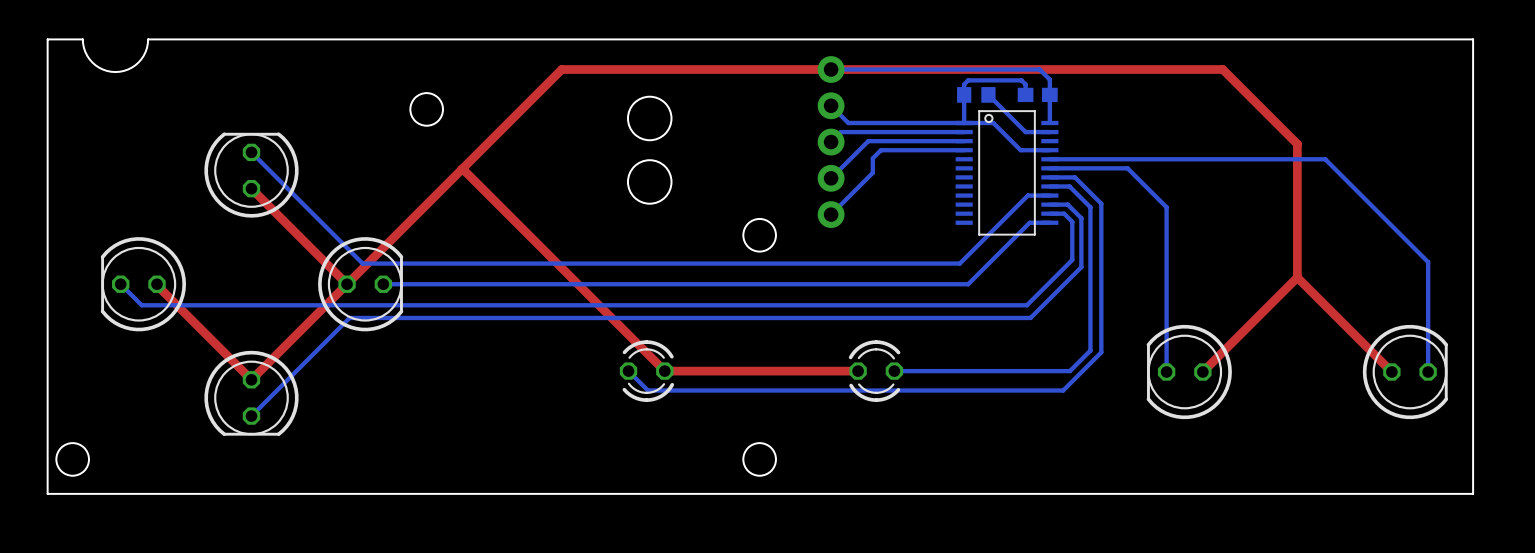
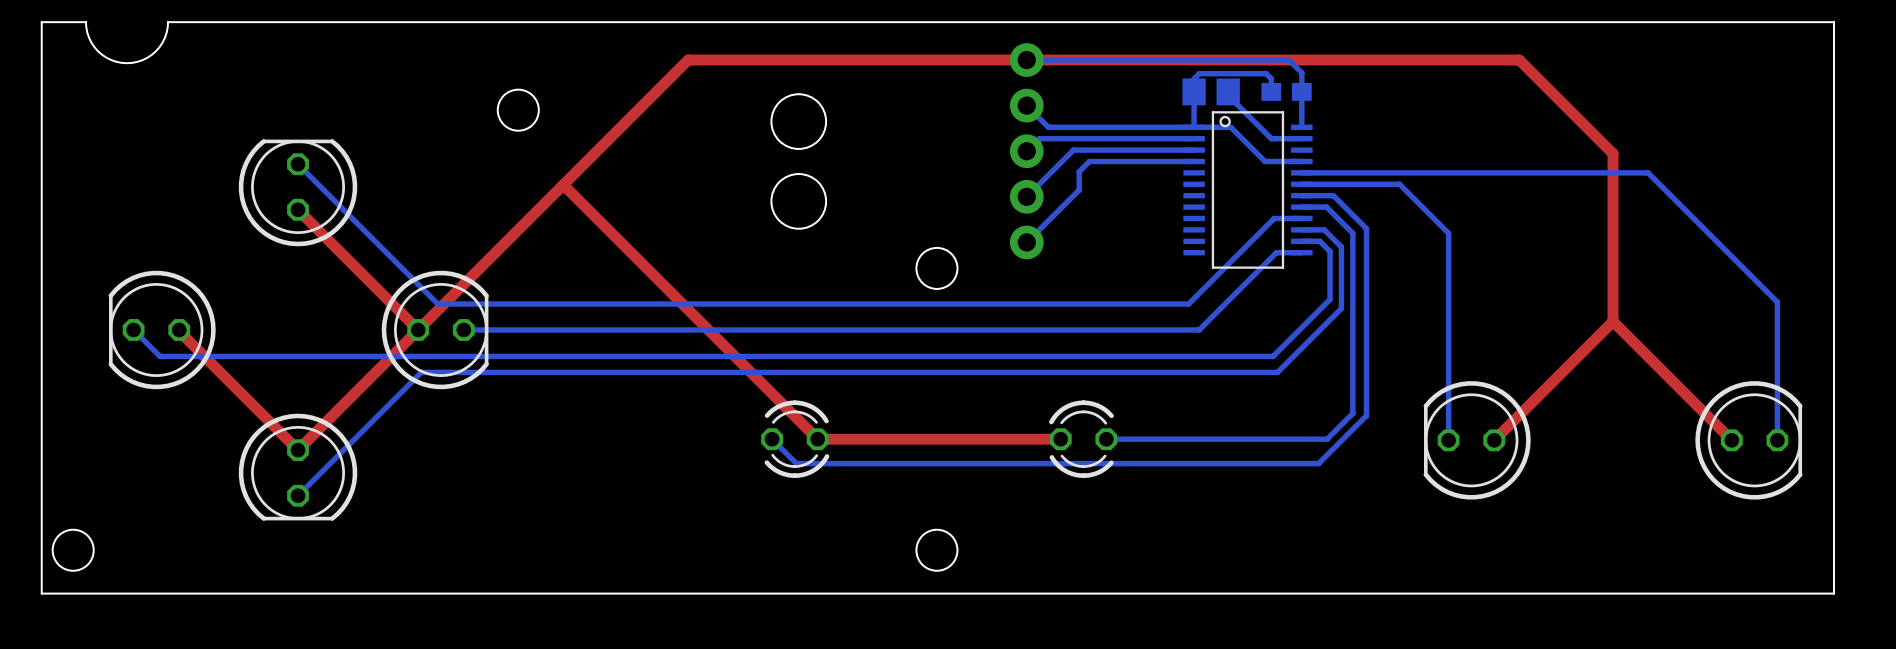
part footprint: [957, 87, 996, 103] -> [1182, 78, 1240, 106]

